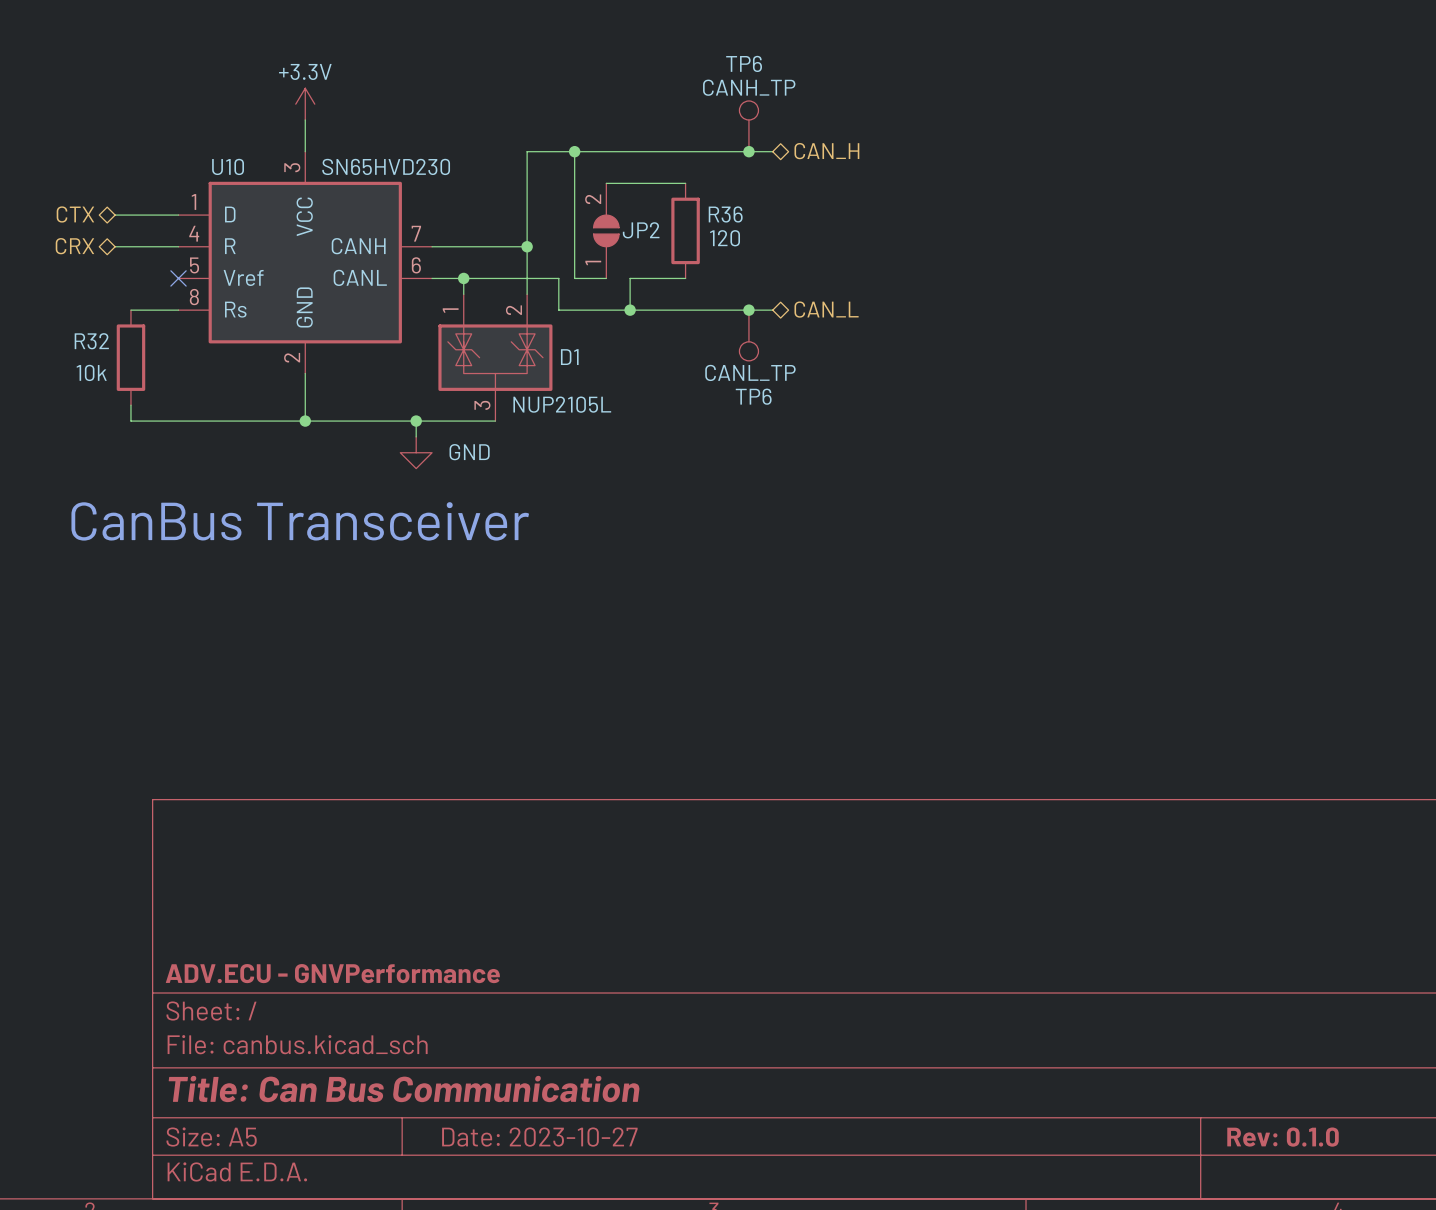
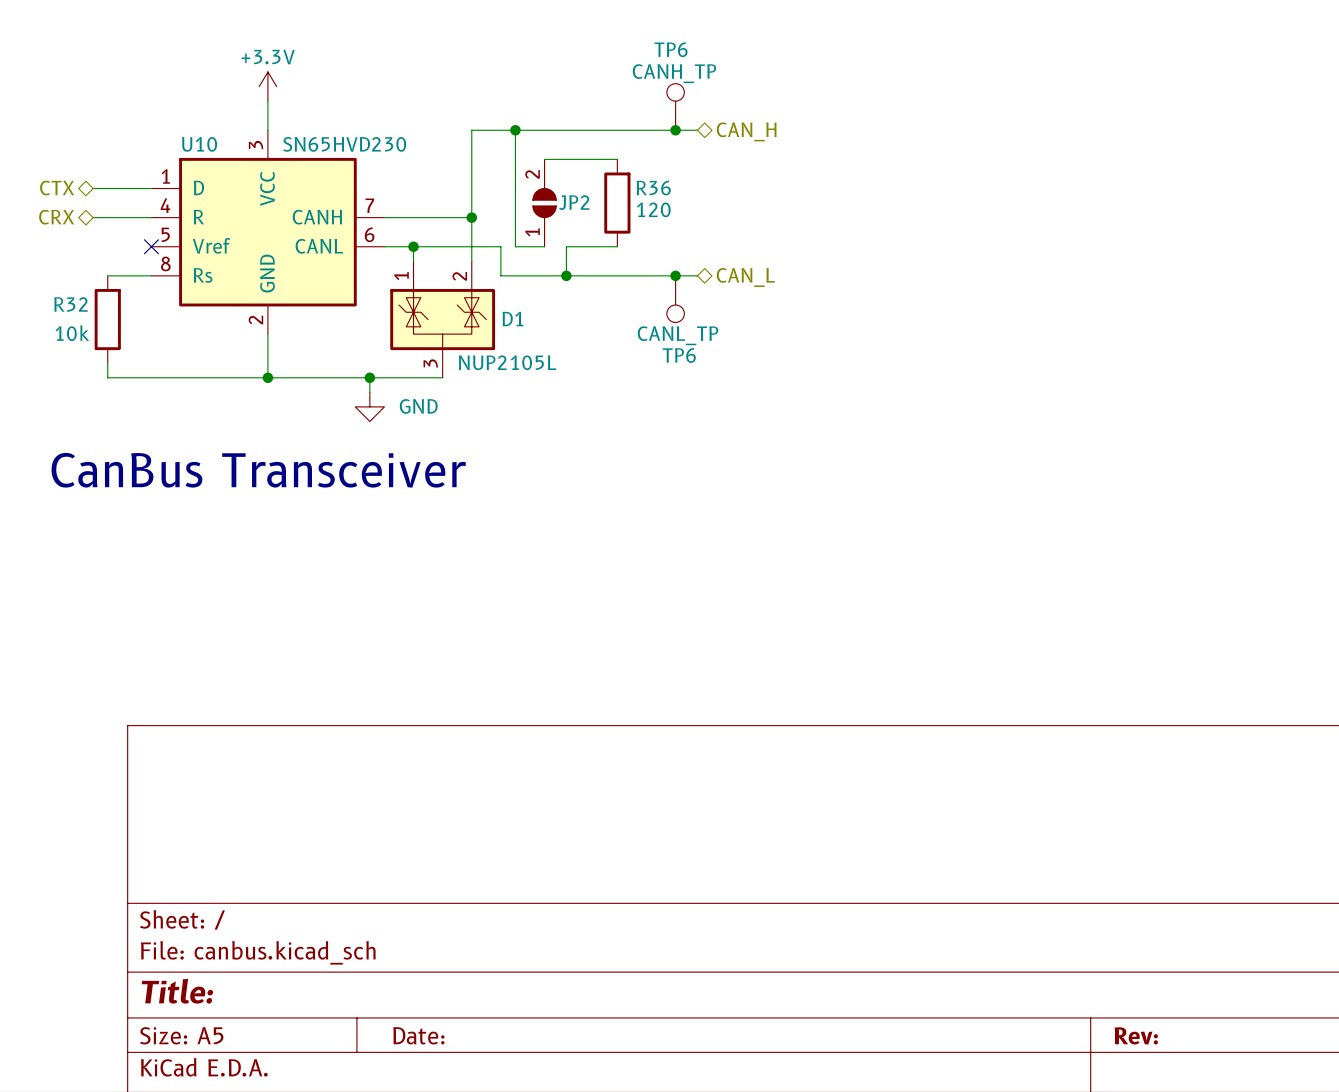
title block: ADV.ECU - GNVPerformance (332, 973) -> none
title block: Title: Can Bus Communication (404, 1088) -> Title: (177, 991)
title block: Date: 2023-10-27 (539, 1137) -> Date: (418, 1035)
title block: Rev: 0.1.0 (1283, 1137) -> Rev: (1136, 1035)

